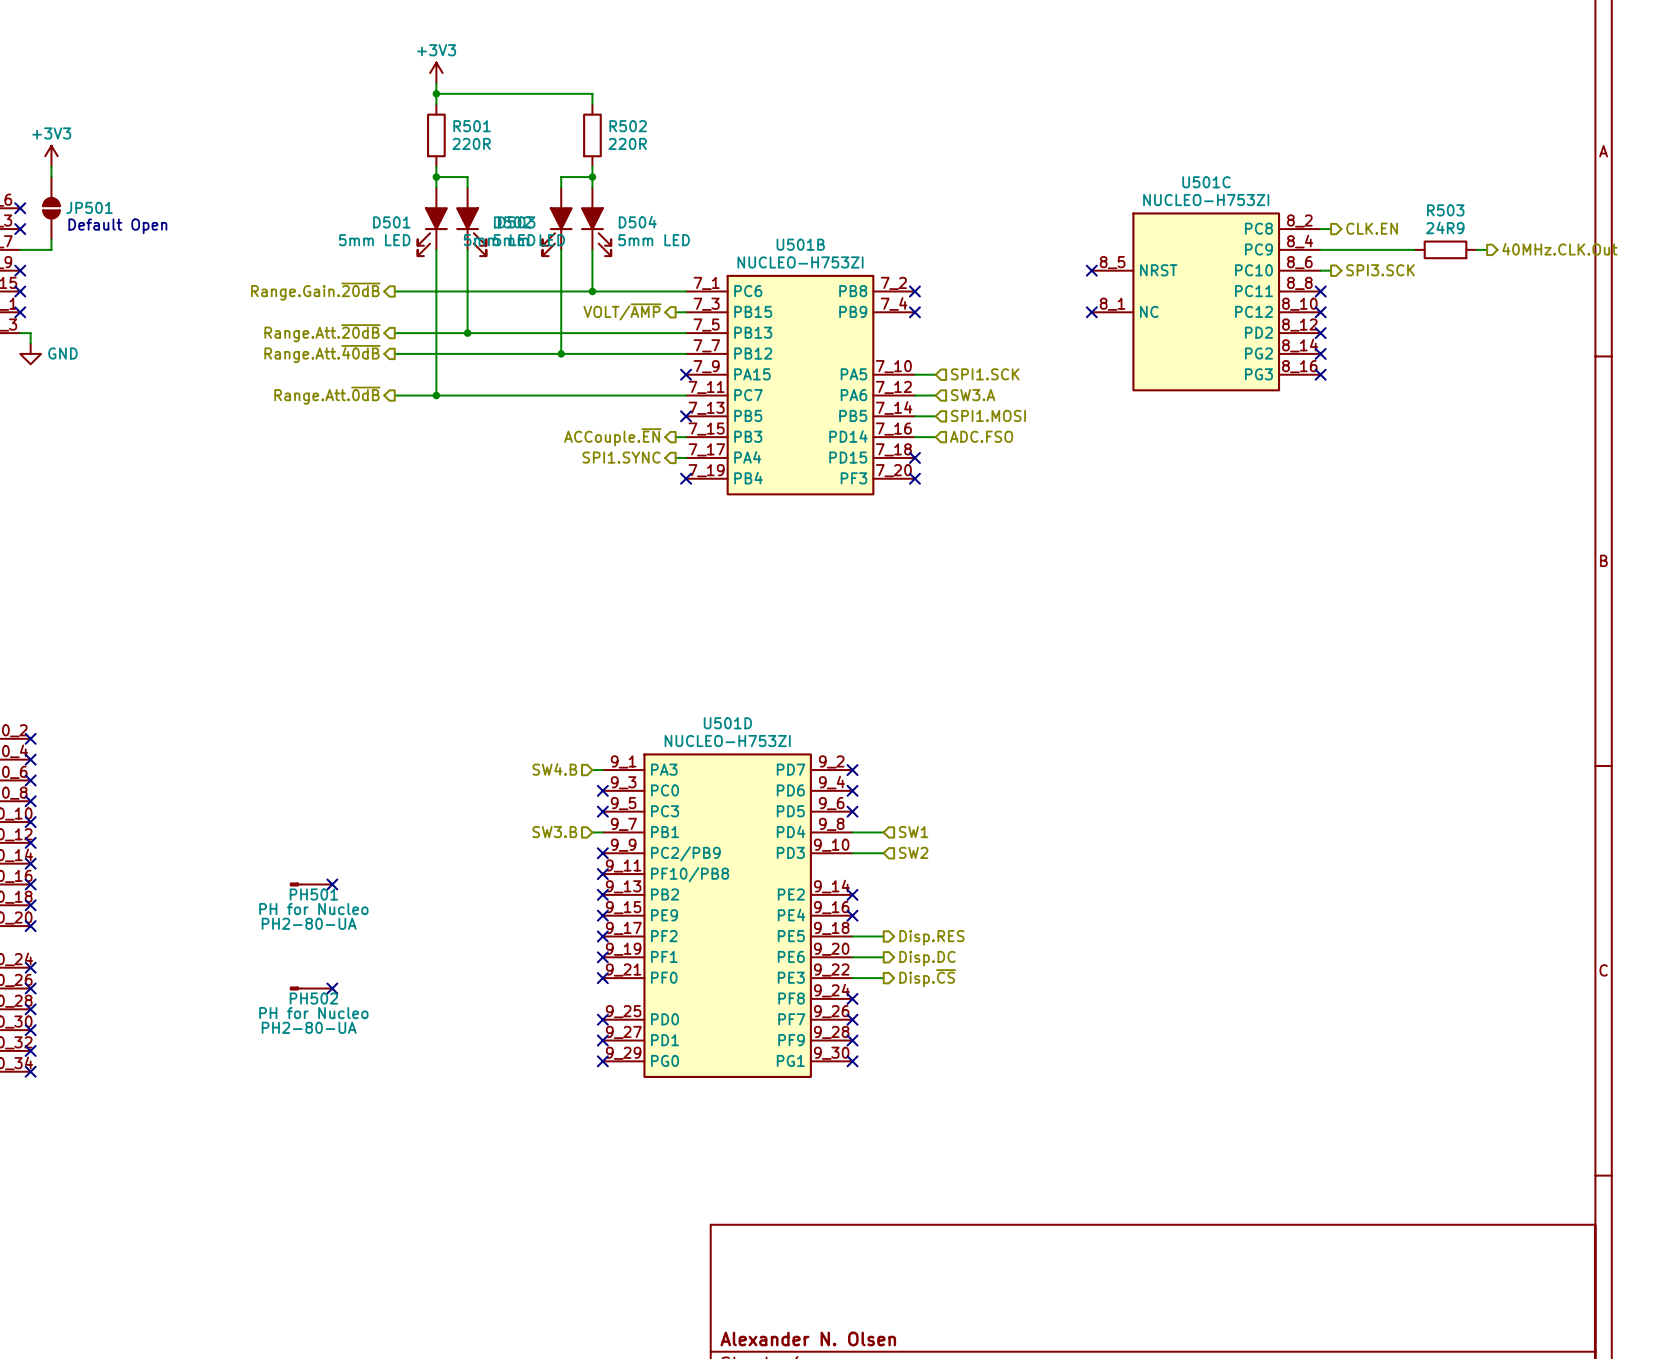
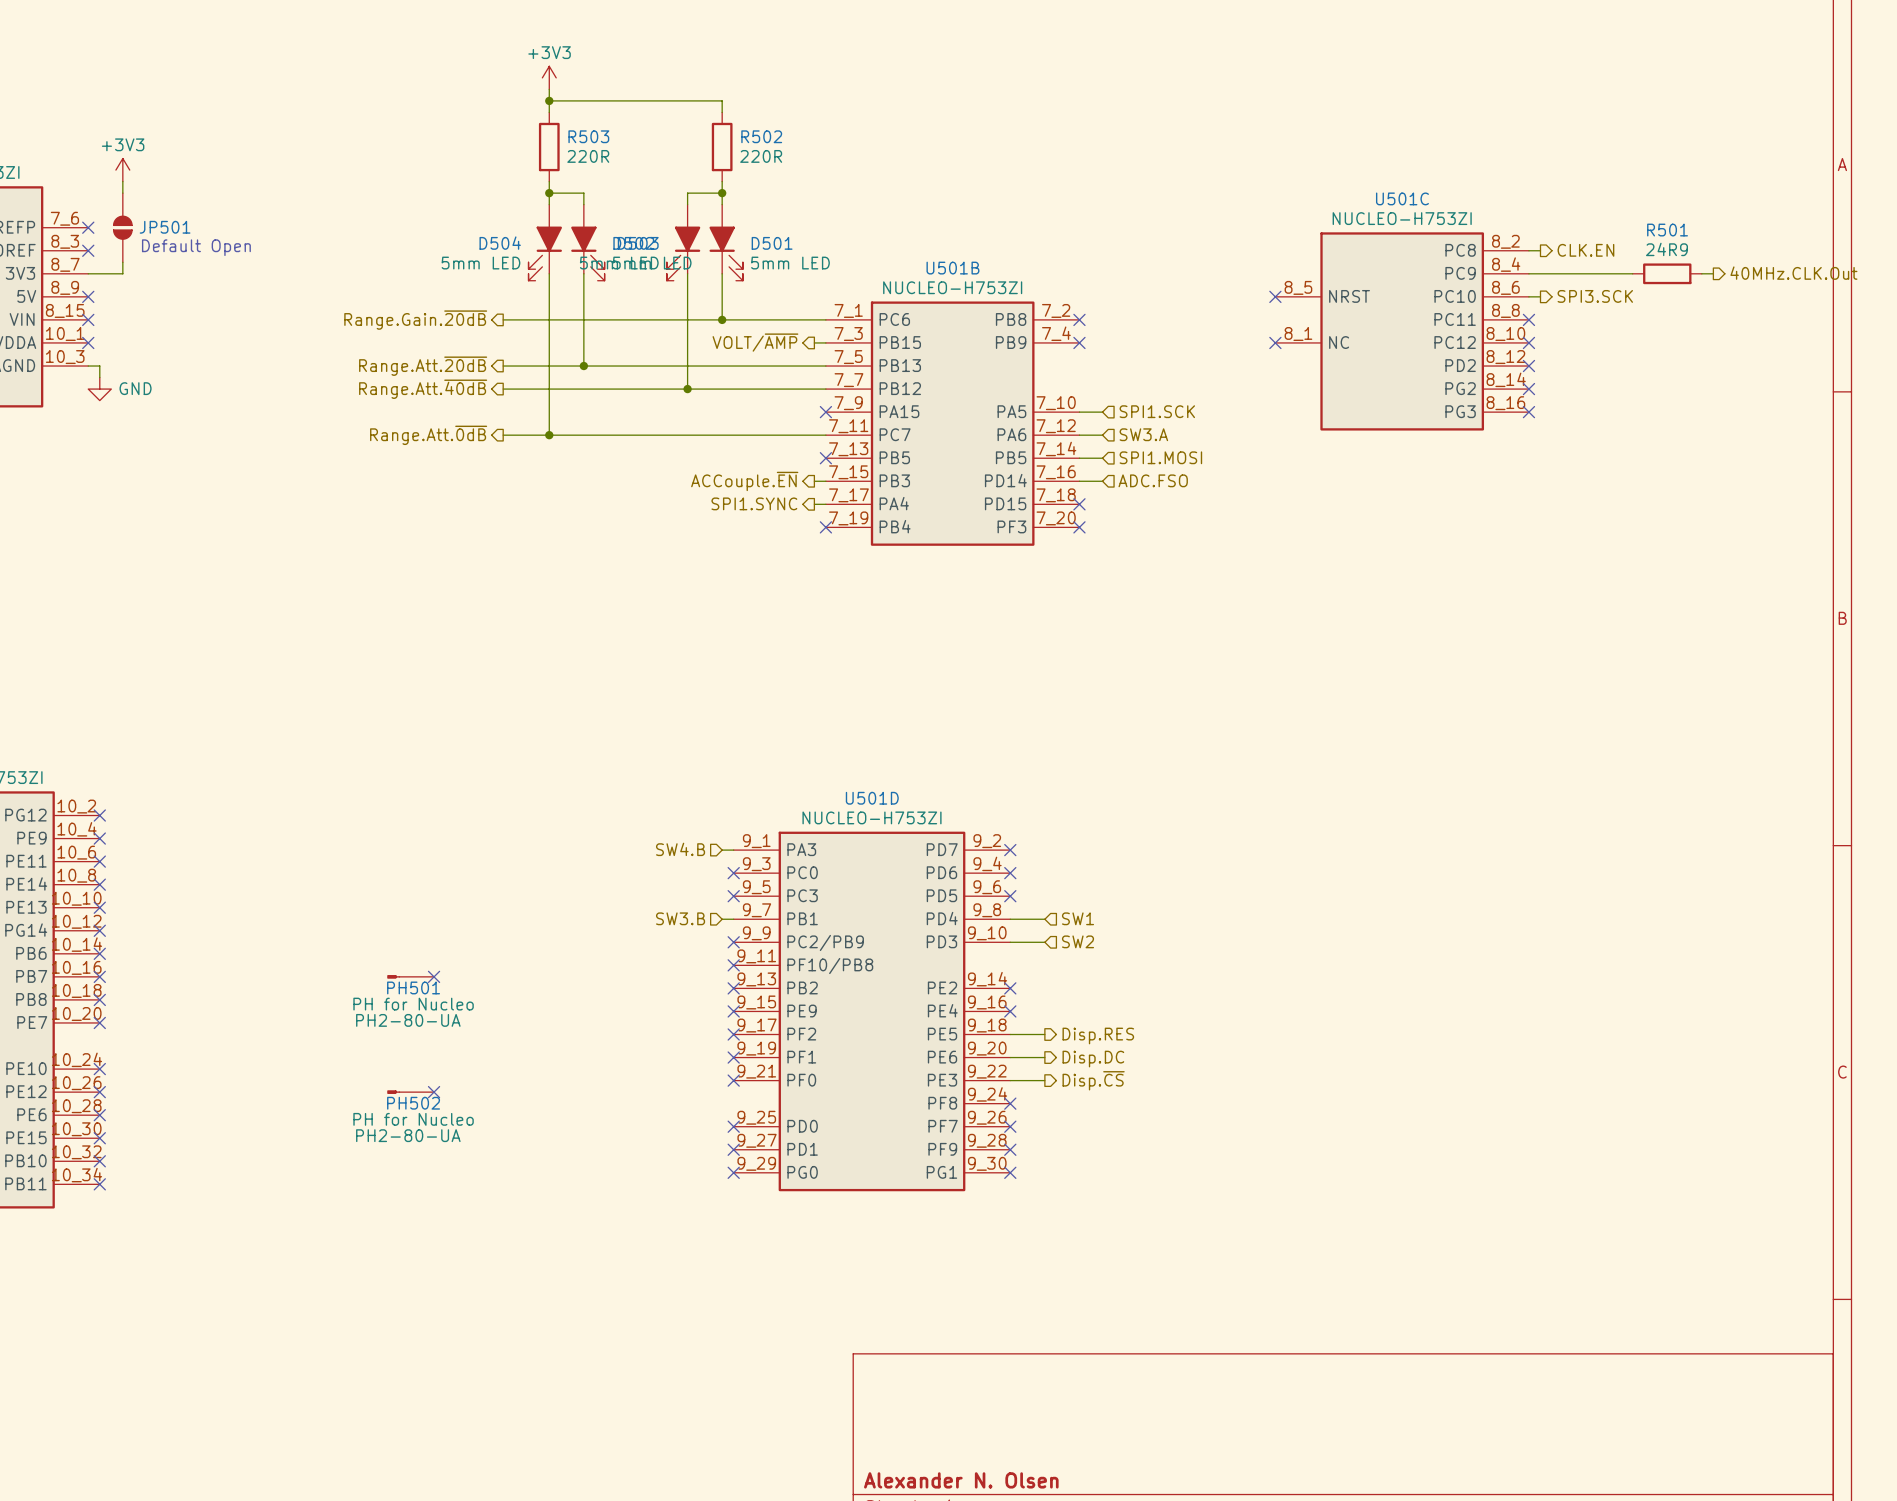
R501 name: R501 (472, 126) -> R503 (588, 136)
R503 name: R503 (1445, 210) -> R501 (1667, 230)
D501 name: D501 (391, 222) -> D504 (500, 243)
D504 name: D504 (637, 222) -> D501 (772, 243)

